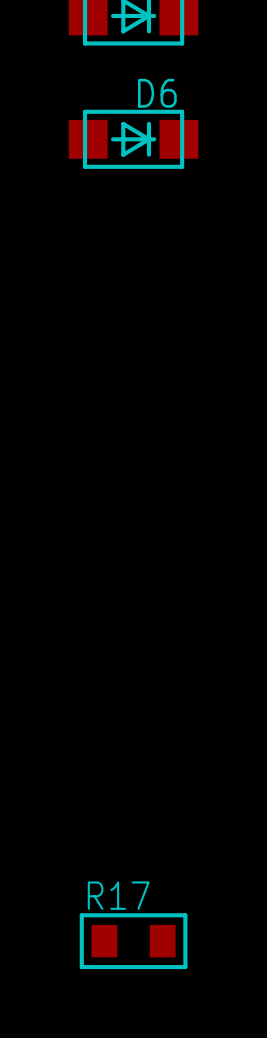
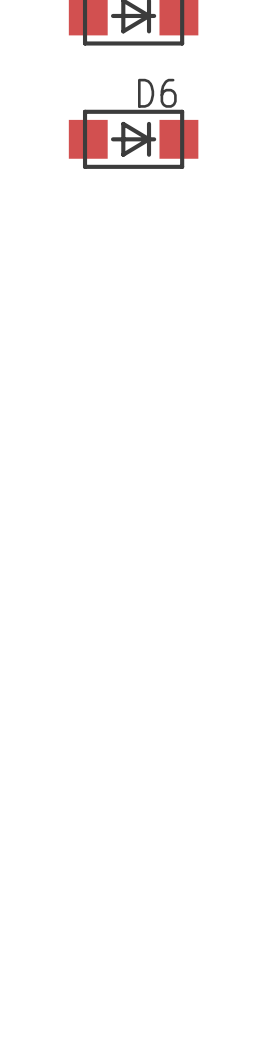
R17: (133, 941) -> none

